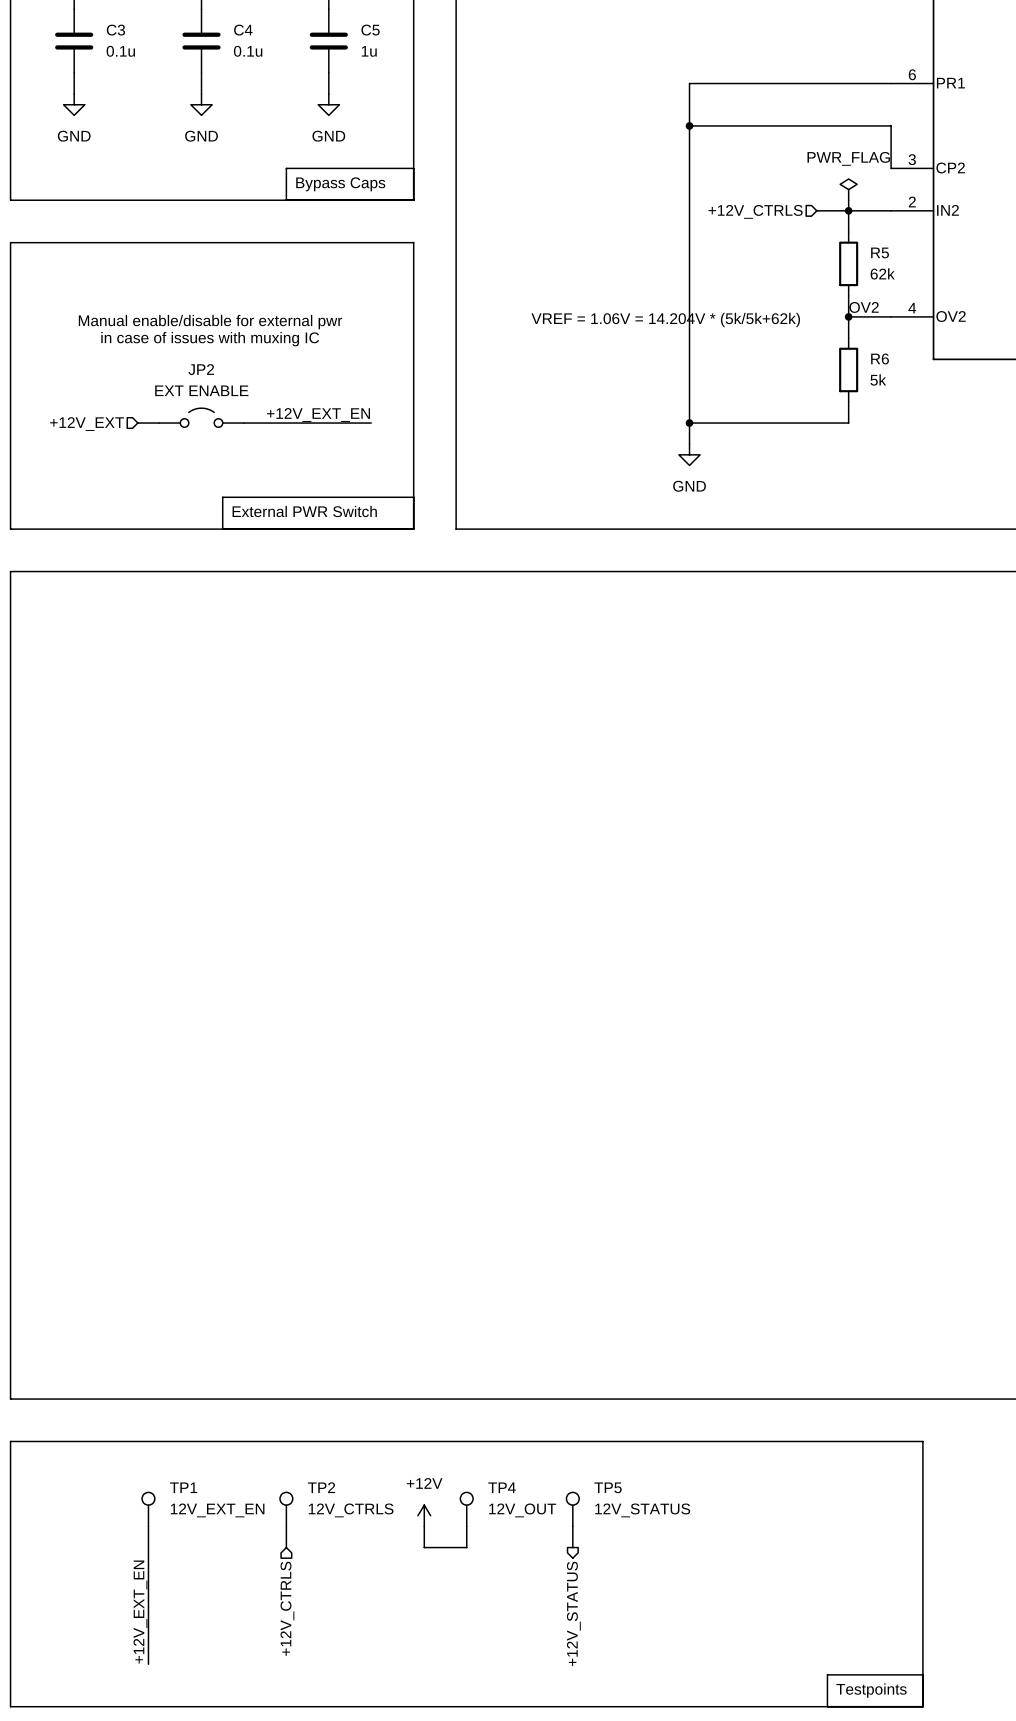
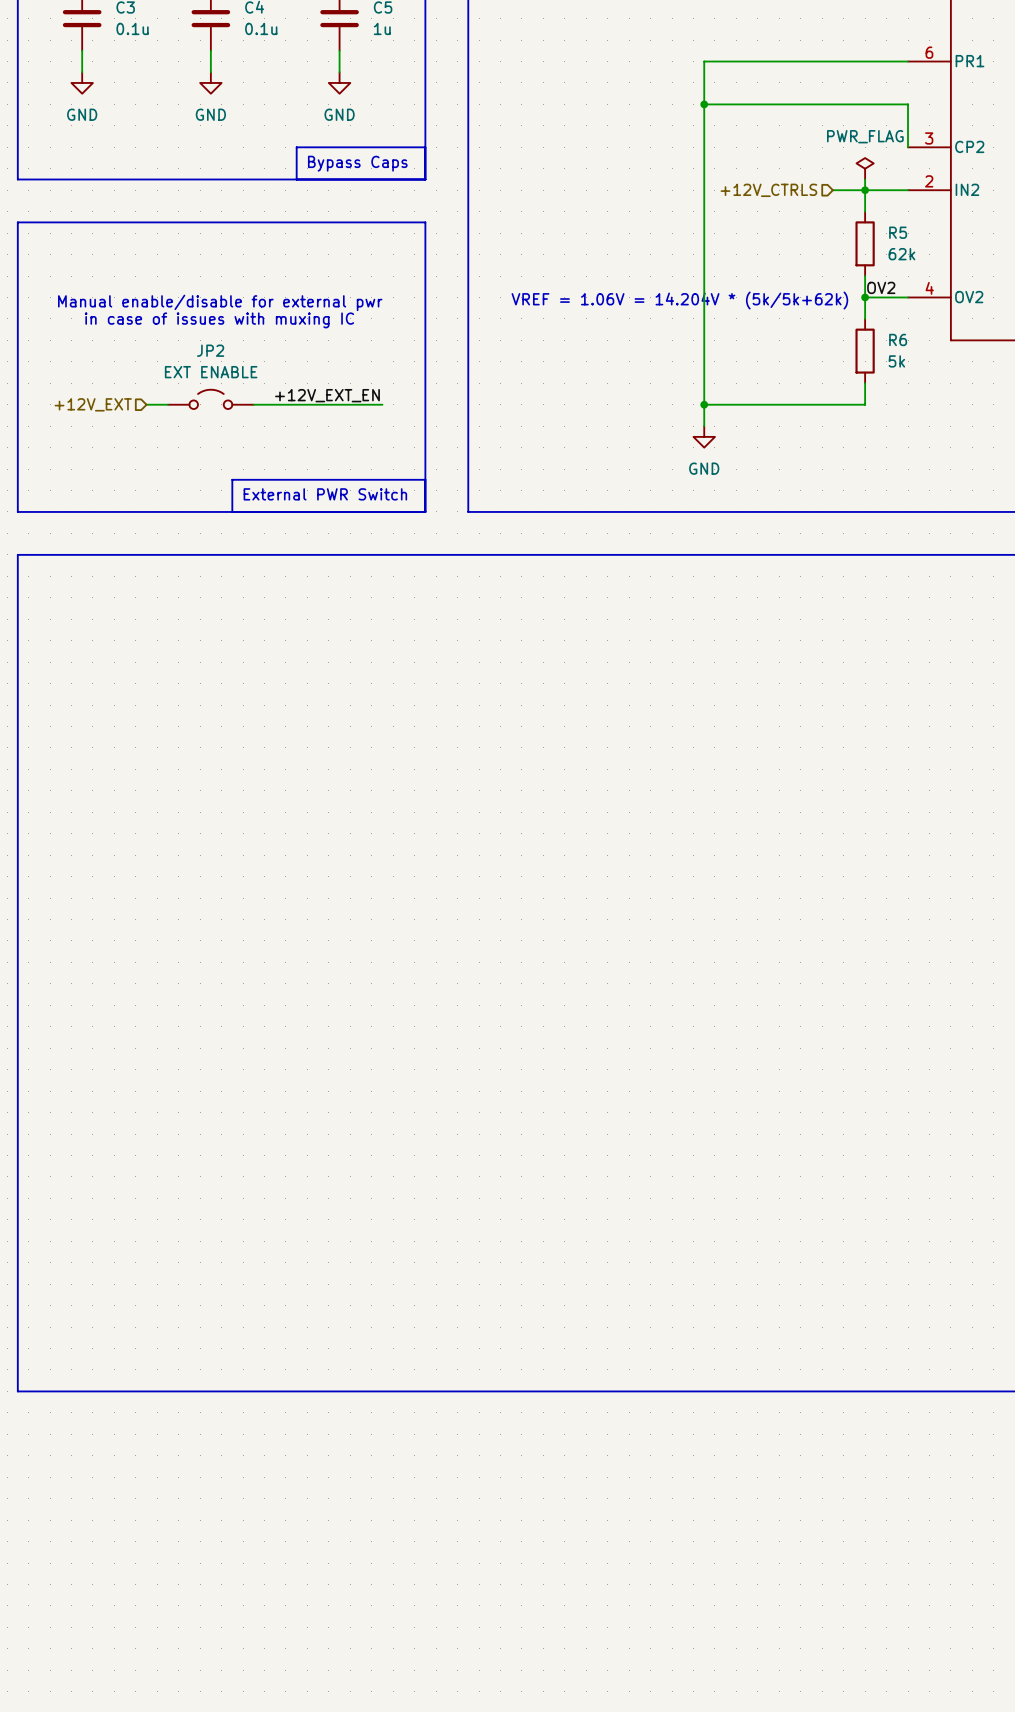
line: (10, 1441) (922, 1441) (922, 1706) (10, 1706) (10, 1441) -> none
TP1: 12V_EXT_EN (148, 1509) -> none
TP2: 12V_CTRLS (286, 1509) -> none
TP4: 12V_OUT (466, 1509) -> none
TP5: 12V_STATUS (572, 1509) -> none
power symbol: +12V (424, 1515) -> none
wire: (148, 1526) (148, 1664) -> none
wire: (286, 1526) (286, 1547) -> none
wire: (424, 1526) (424, 1547) (466, 1547) (466, 1526) -> none
wire: (572, 1526) (572, 1547) -> none
hierarchical label: +12V_CTRLS (287, 1608) -> none
label: +12V_EXT_EN (140, 1612) -> none
hierarchical label: +12V_STATUS (573, 1613) -> none
line: (922, 1674) (827, 1674) (827, 1706) -> none
text: Testpoints (871, 1690) -> none

